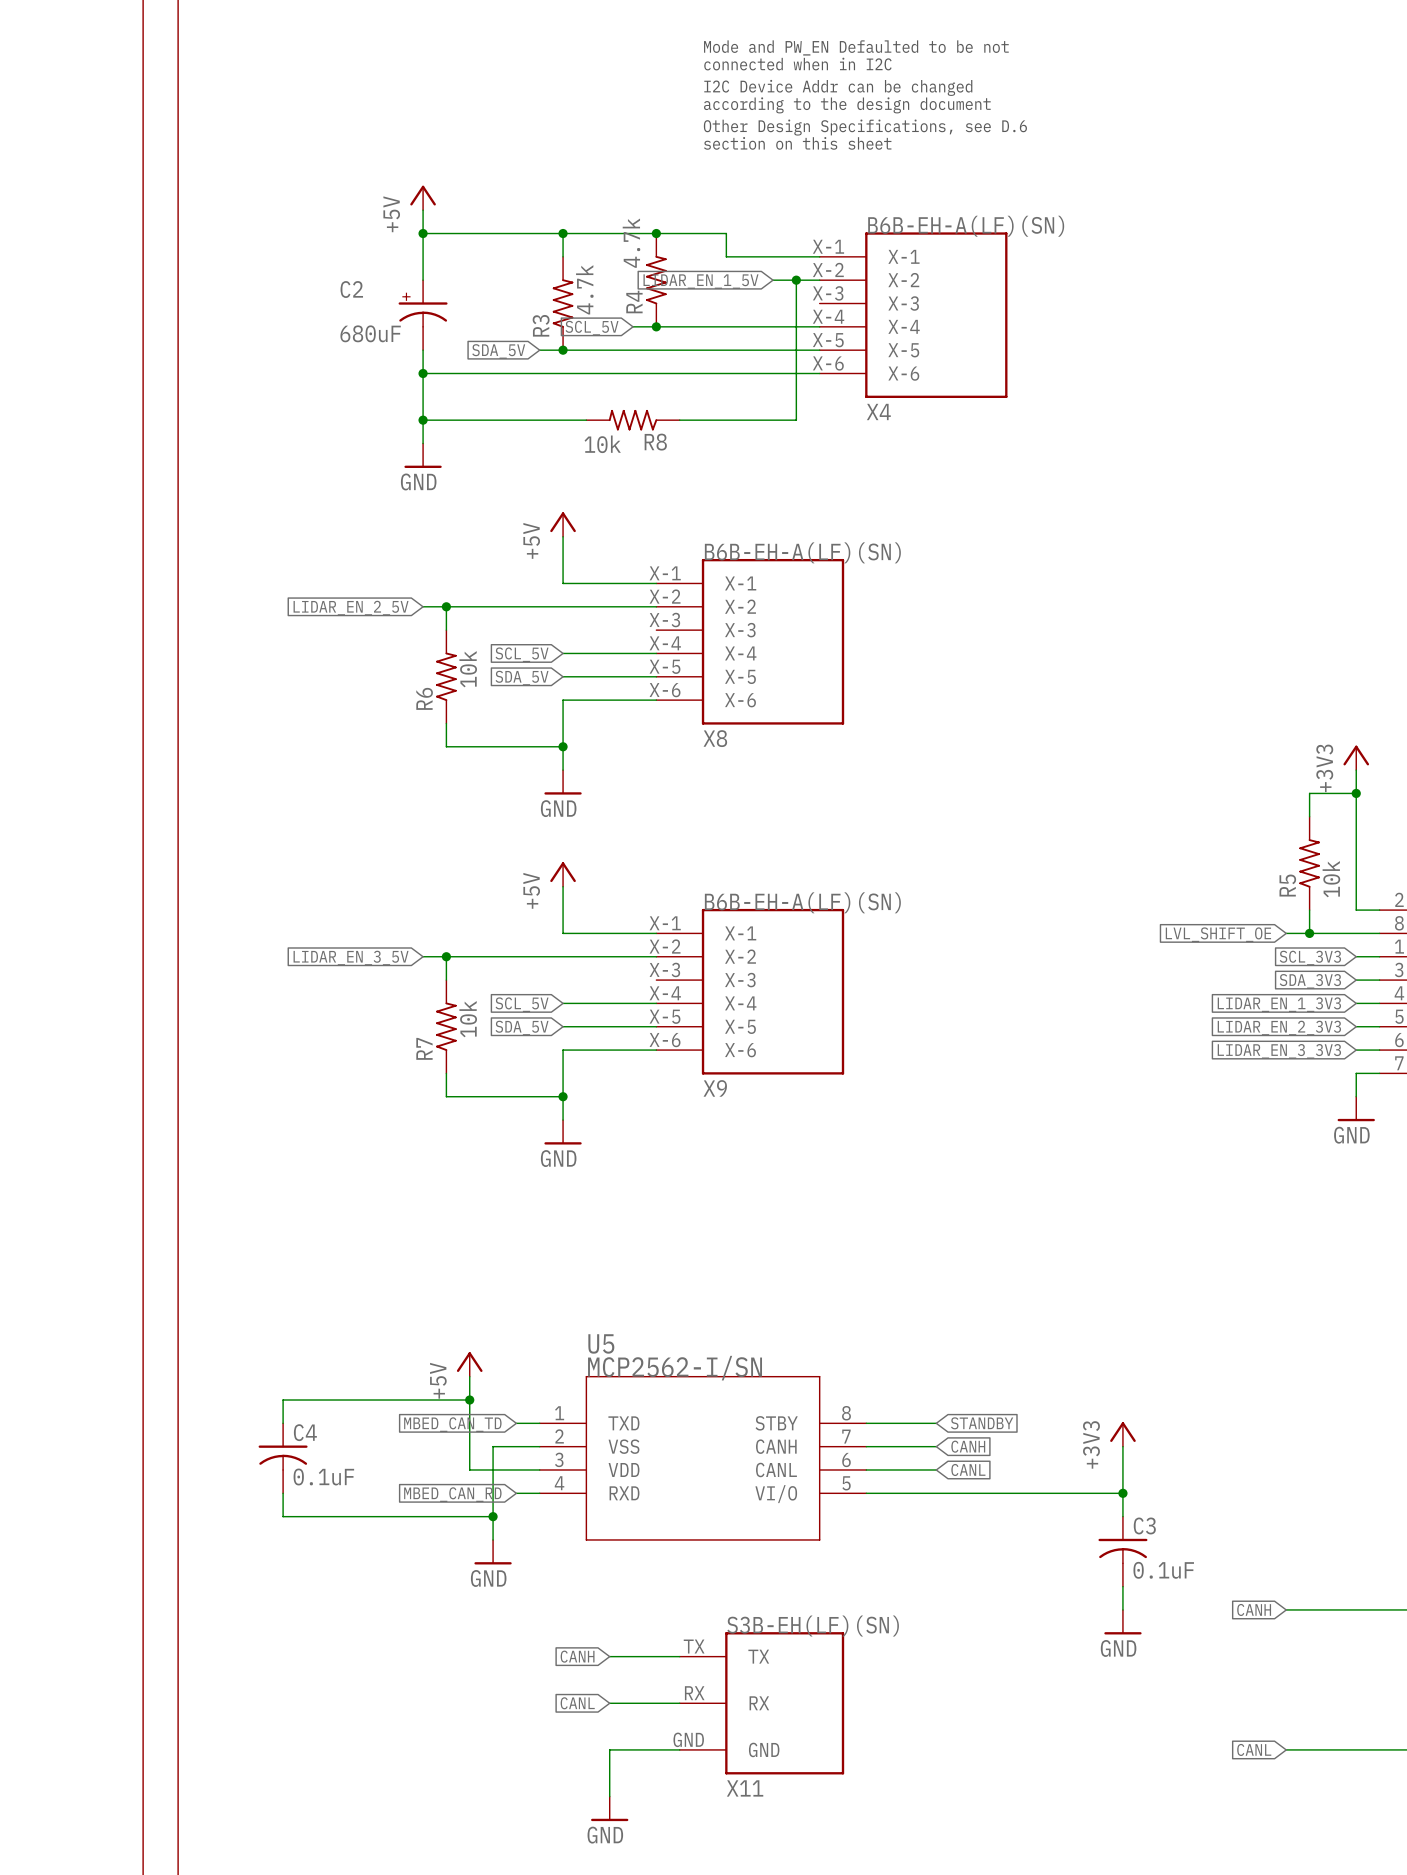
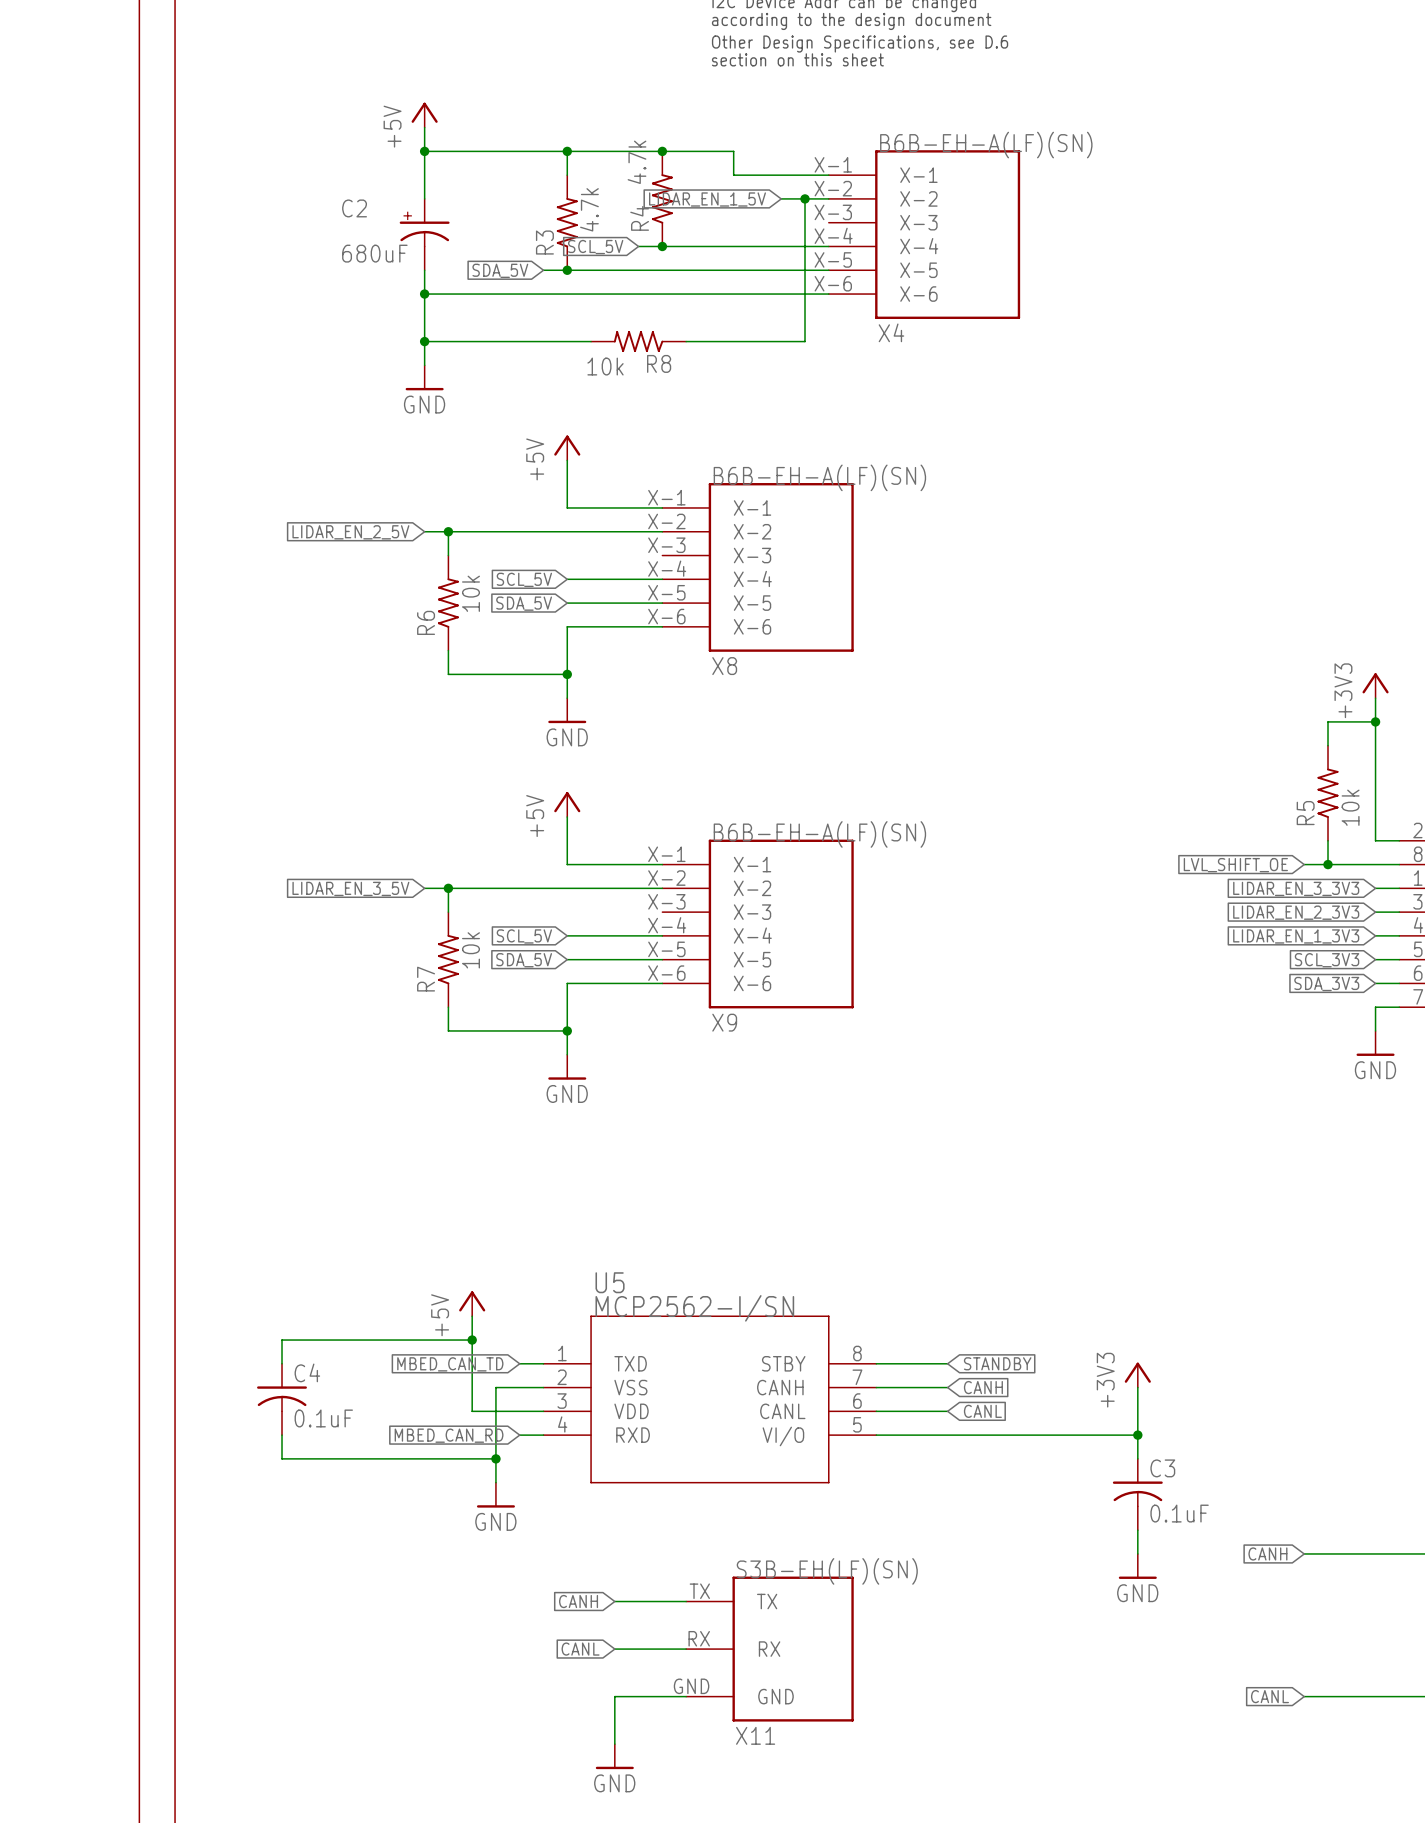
global label: SCL_3V3 (1310, 958) -> LIDAR_EN_3_3V3 (1296, 888)
global label: SDA_3V3 (1310, 981) -> LIDAR_EN_2_3V3 (1296, 912)
global label: LIDAR_EN_2_3V3 (1279, 1028) -> SCL_3V3 (1327, 960)
global label: LIDAR_EN_3_3V3 (1279, 1051) -> SDA_3V3 (1326, 984)

